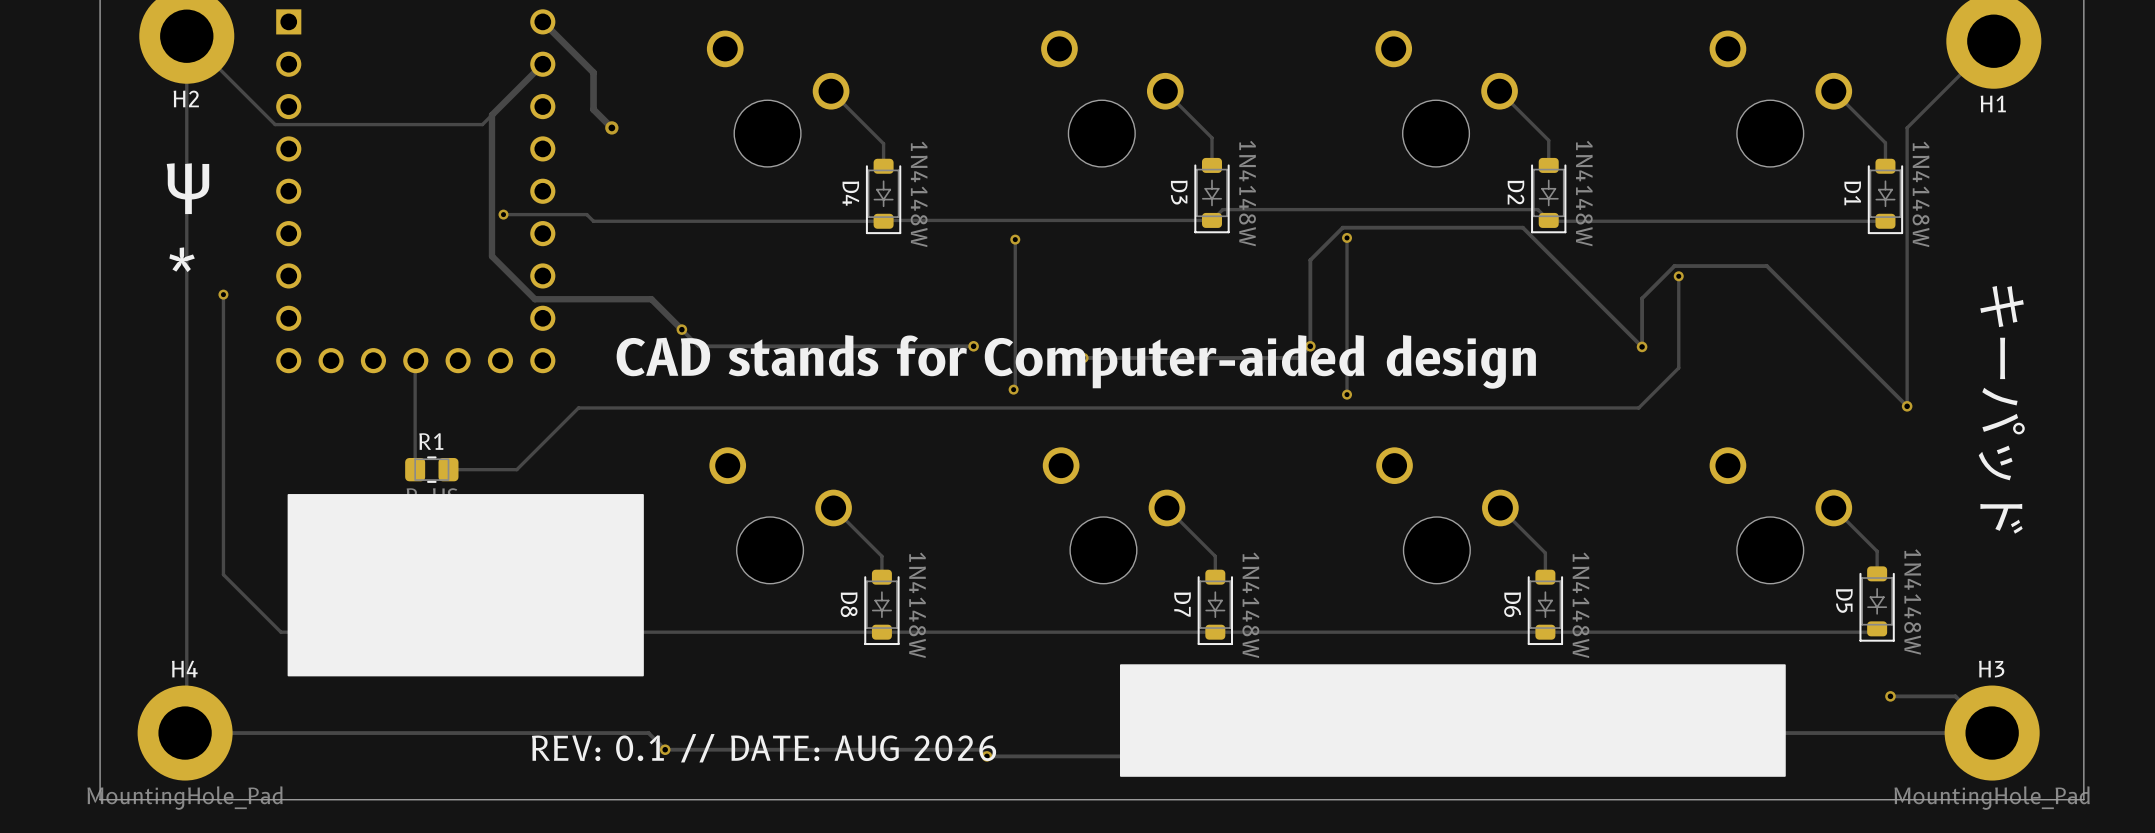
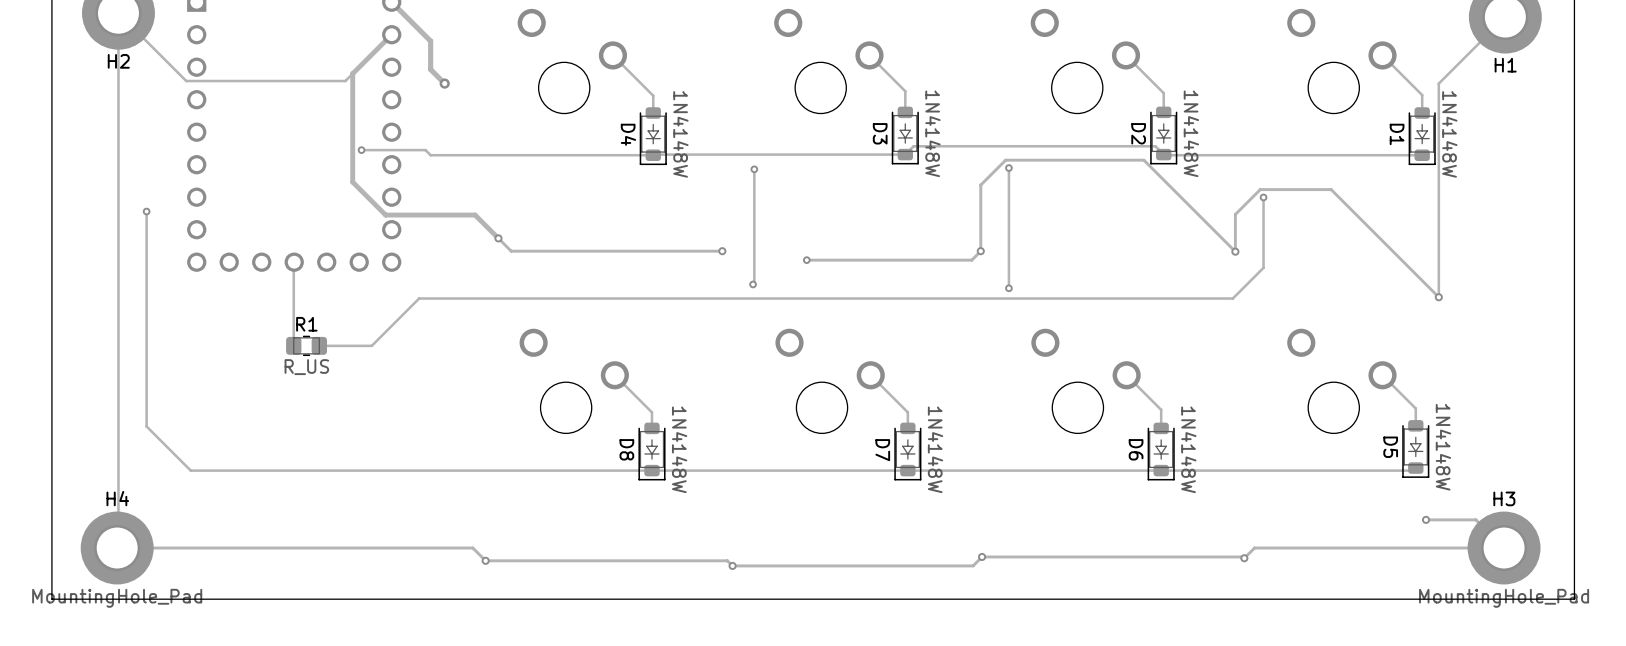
text: Ψ (188, 188) -> none
text: * (182, 259) -> none
text: CAD stands for Computer-aided design (1076, 361) -> none
text: キーパッド (2001, 409) -> none
drawing: [287, 494, 644, 677] -> none
drawing: [1119, 664, 1786, 777] -> none
text: REV: 0.1 // DATE: AUG 2026 (764, 748) -> none

